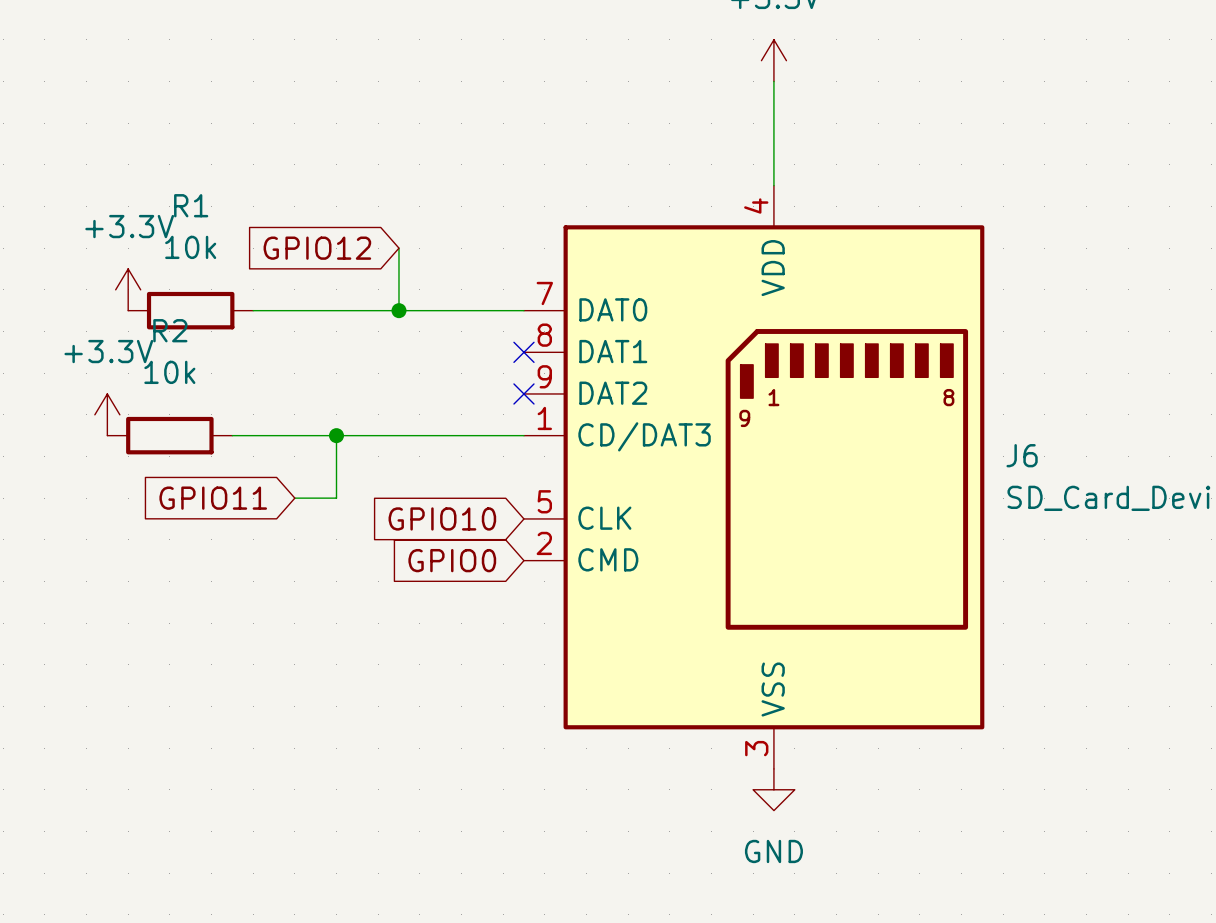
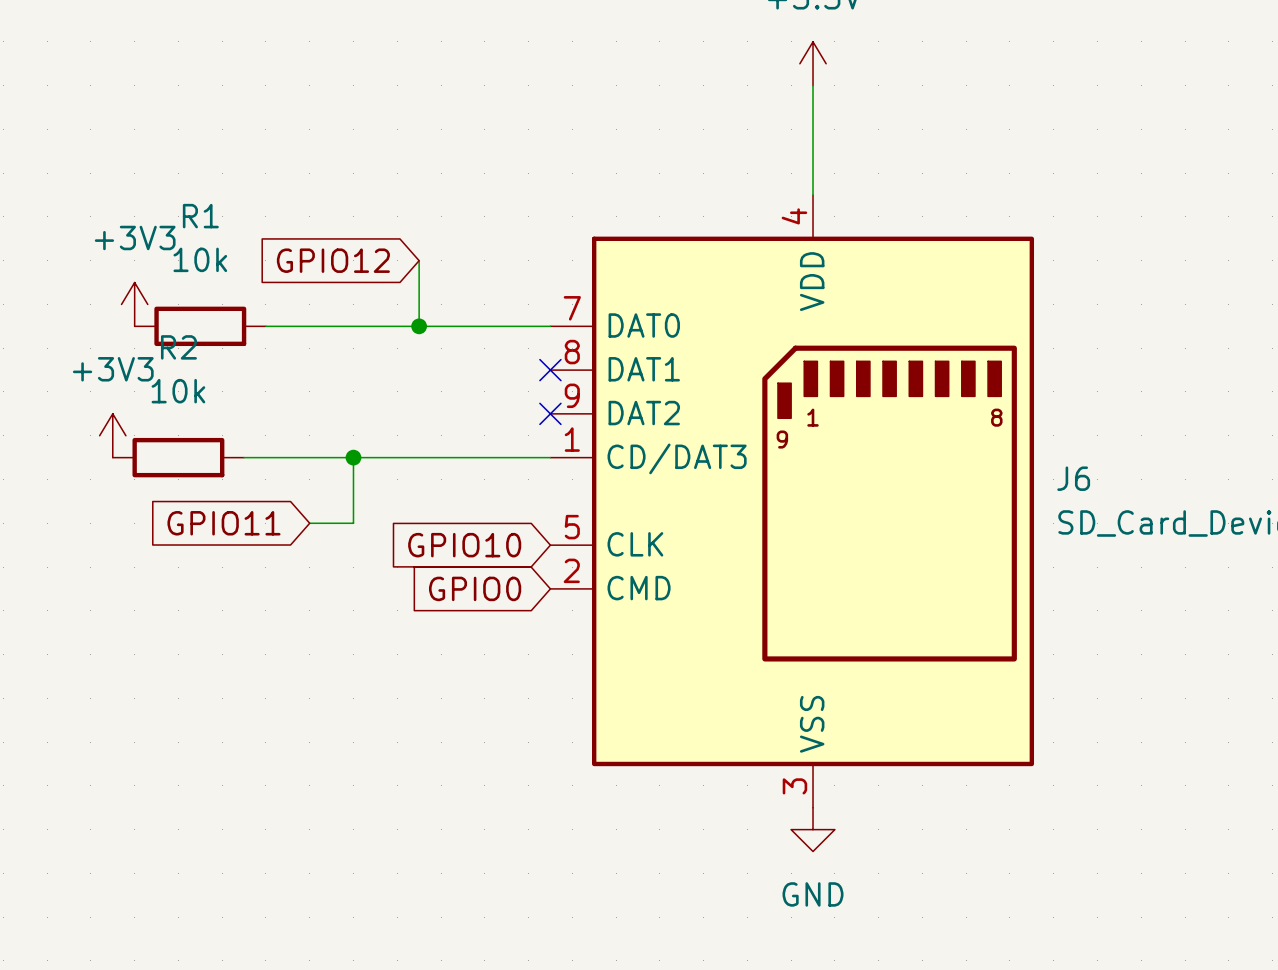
power symbol: +3.3V (128, 289) -> +3V3 (134, 304)
power symbol: +3.3V (107, 414) -> +3V3 (112, 435)

